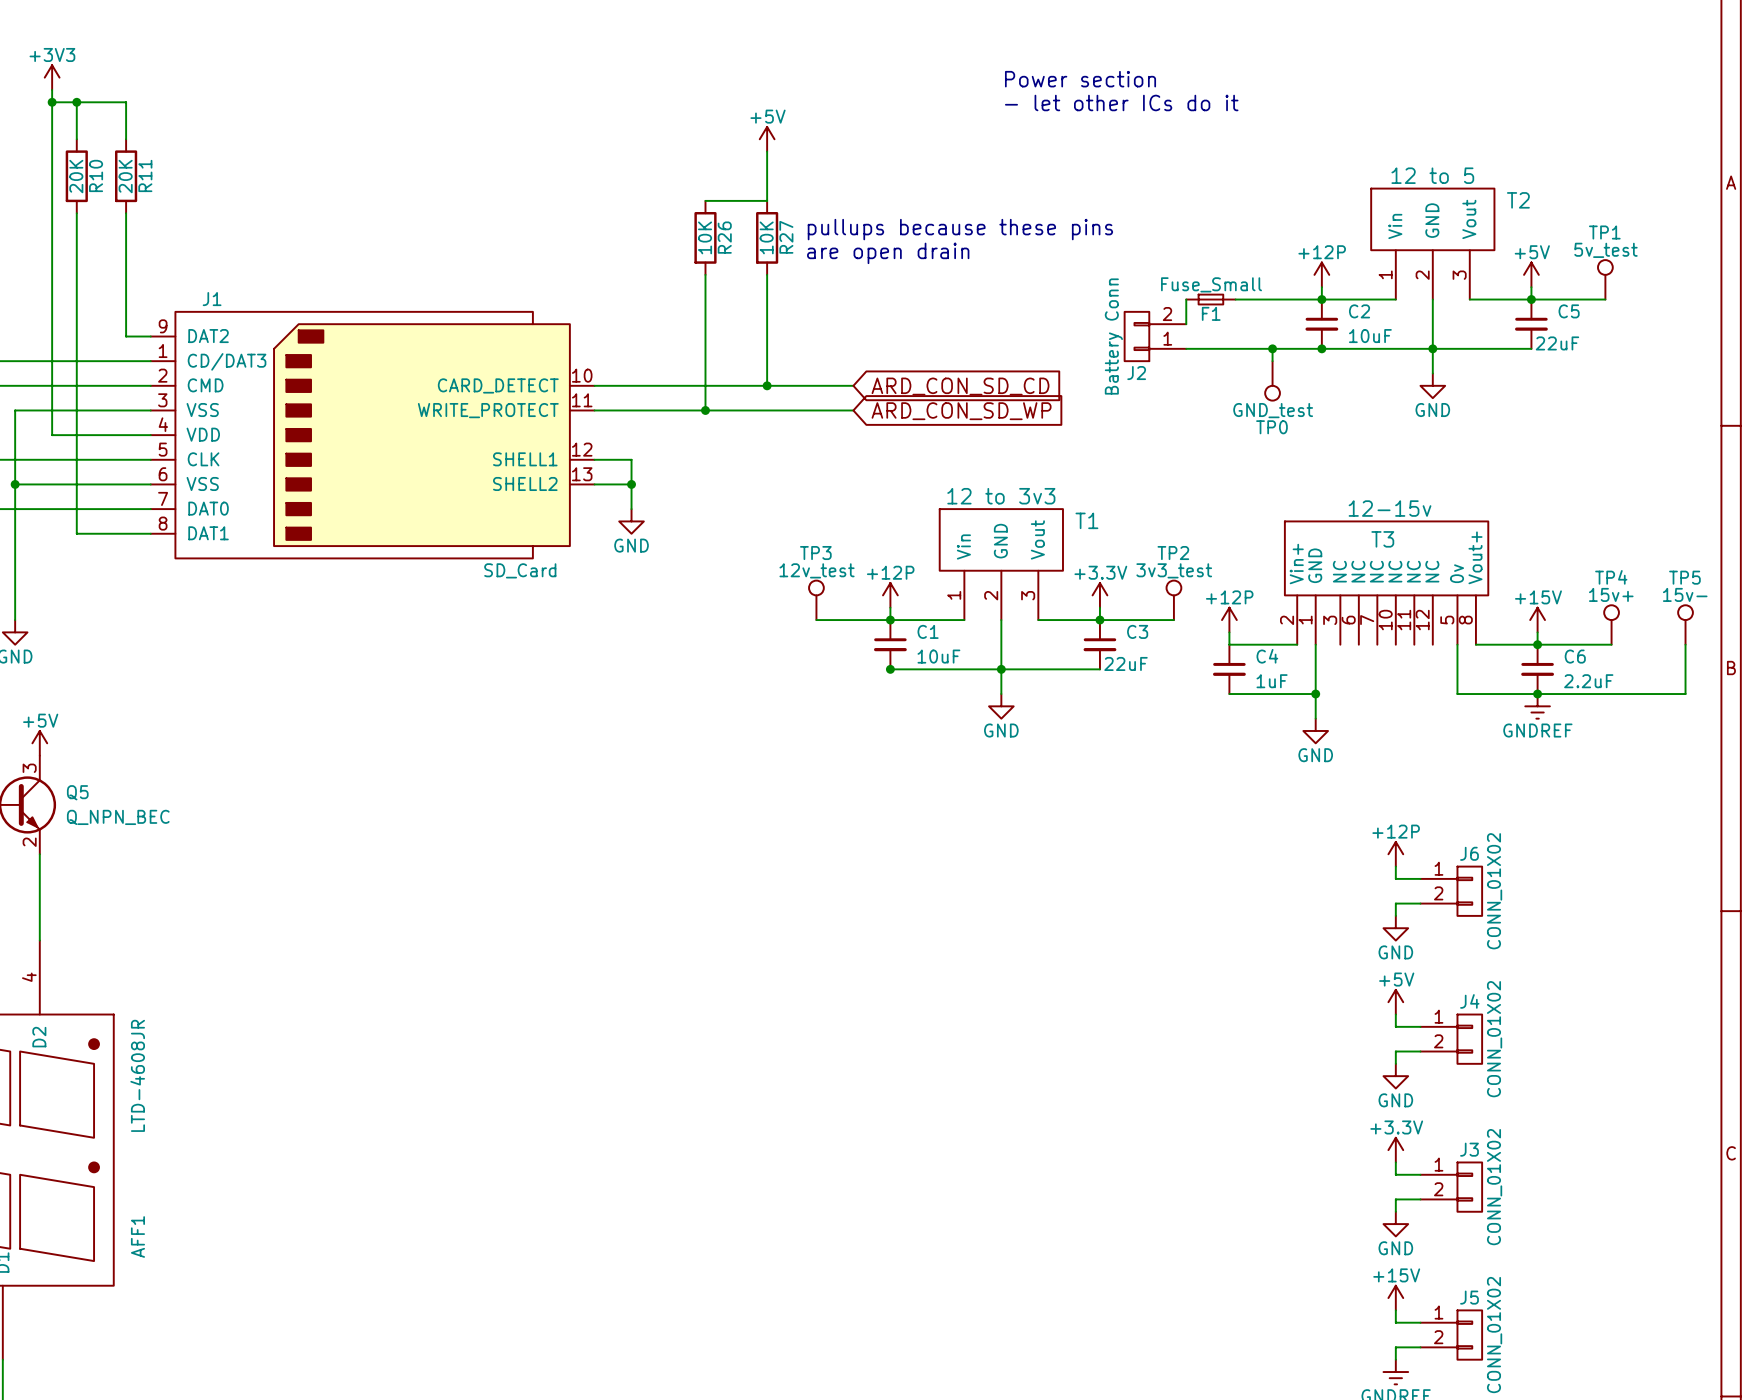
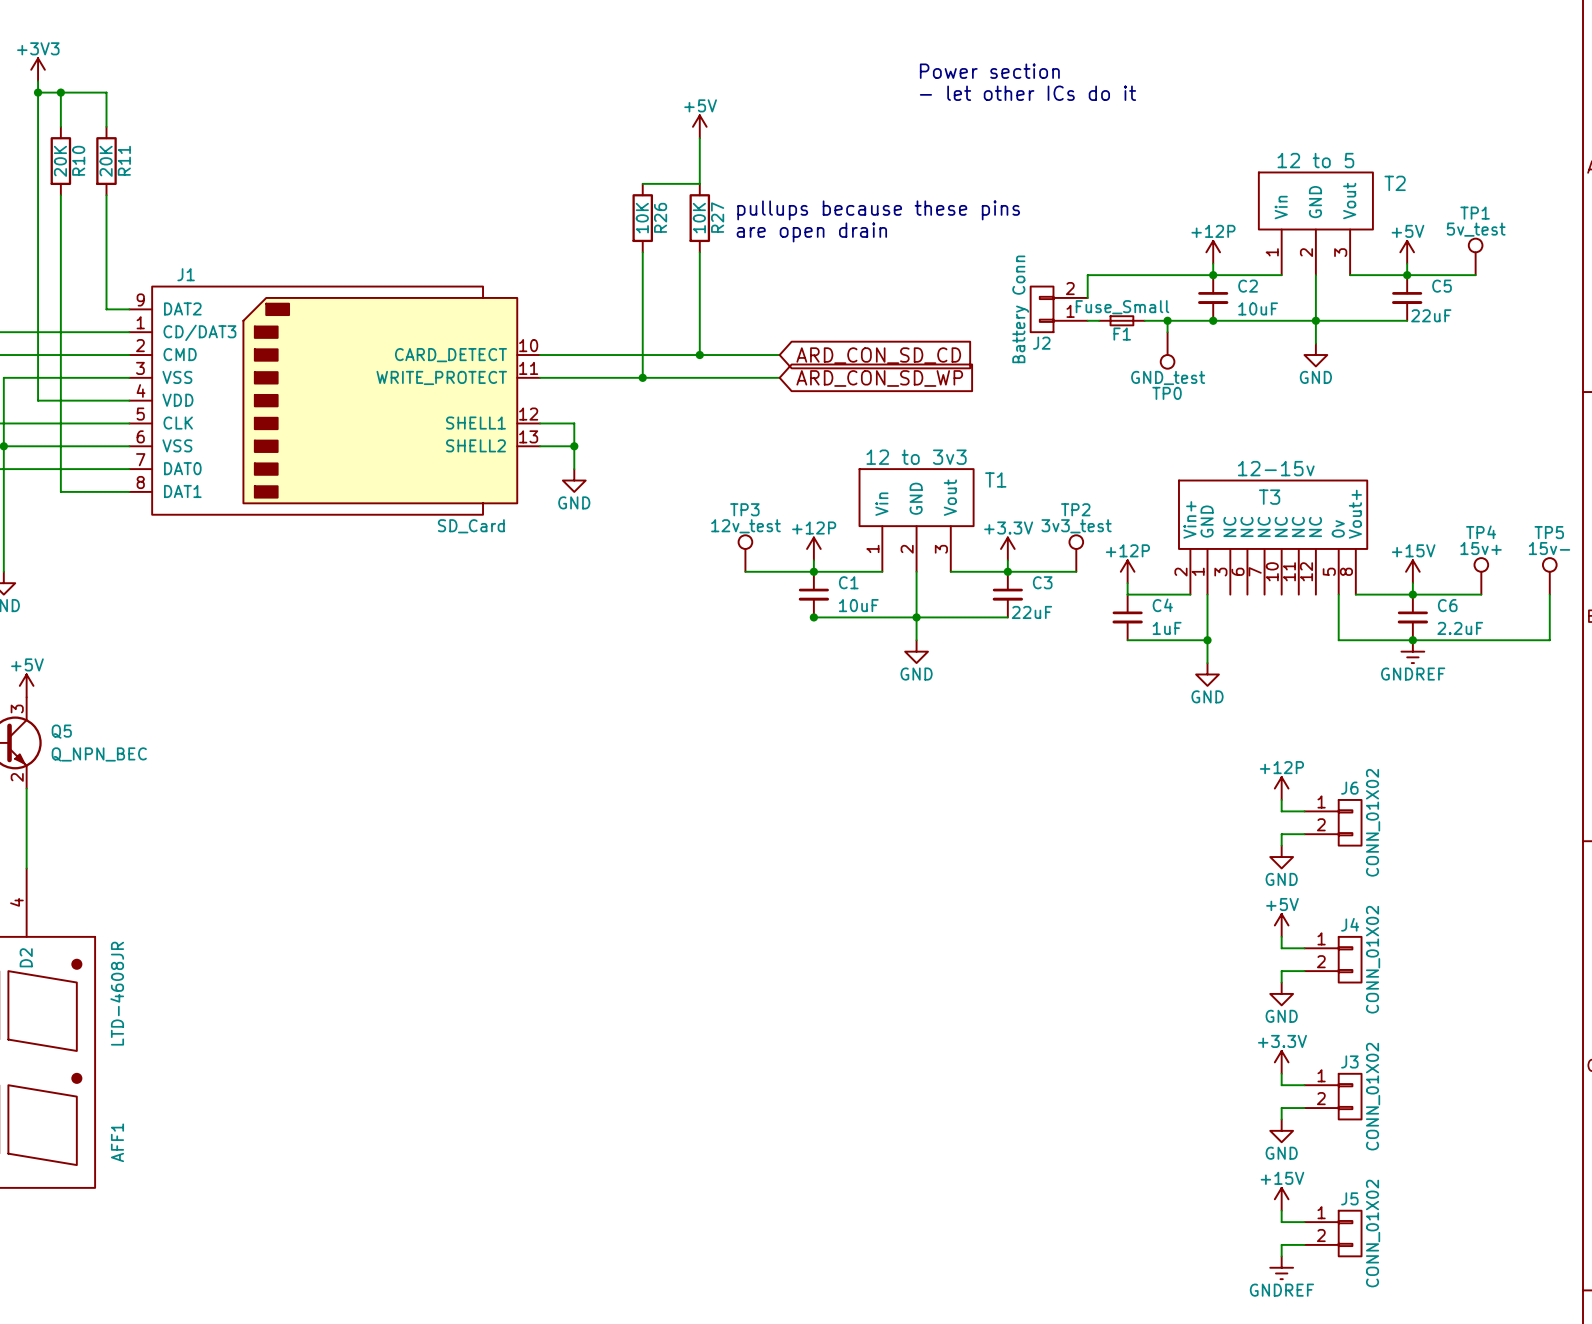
F1 position: (1210, 299) -> (1121, 320)

